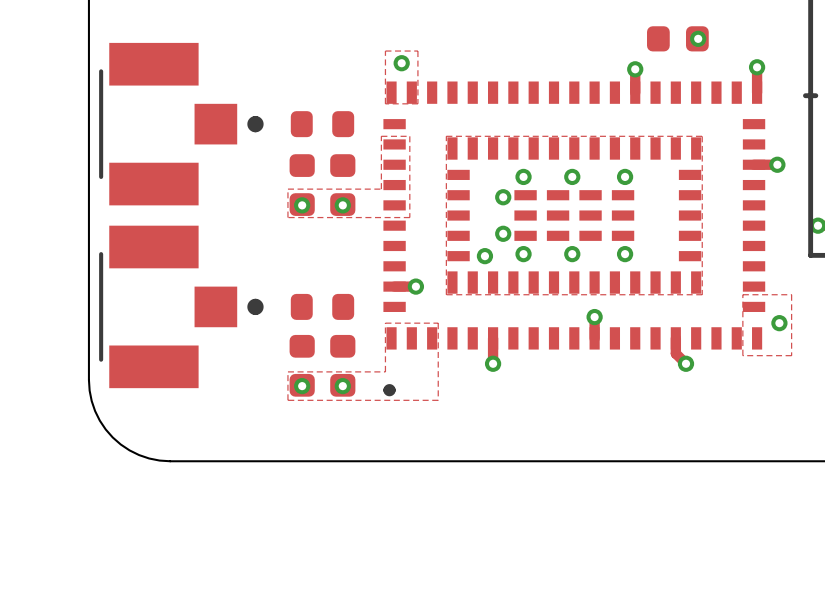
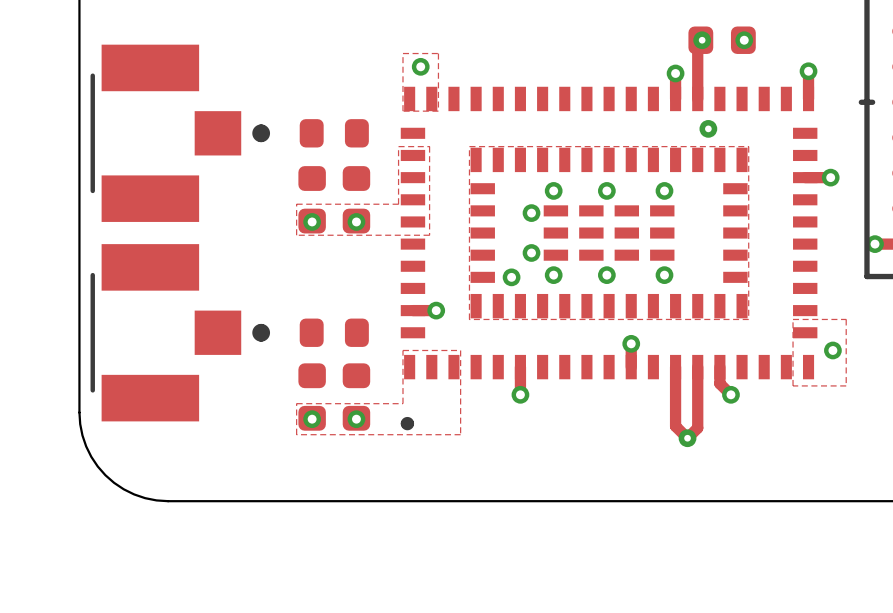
track: none -> (702, 40) (697, 44) (697, 98)
via: none -> (702, 40)
via: none -> (708, 128)
track: none -> (675, 367) (675, 426) (687, 438) (697, 428) (697, 367)
via: none -> (687, 438)

